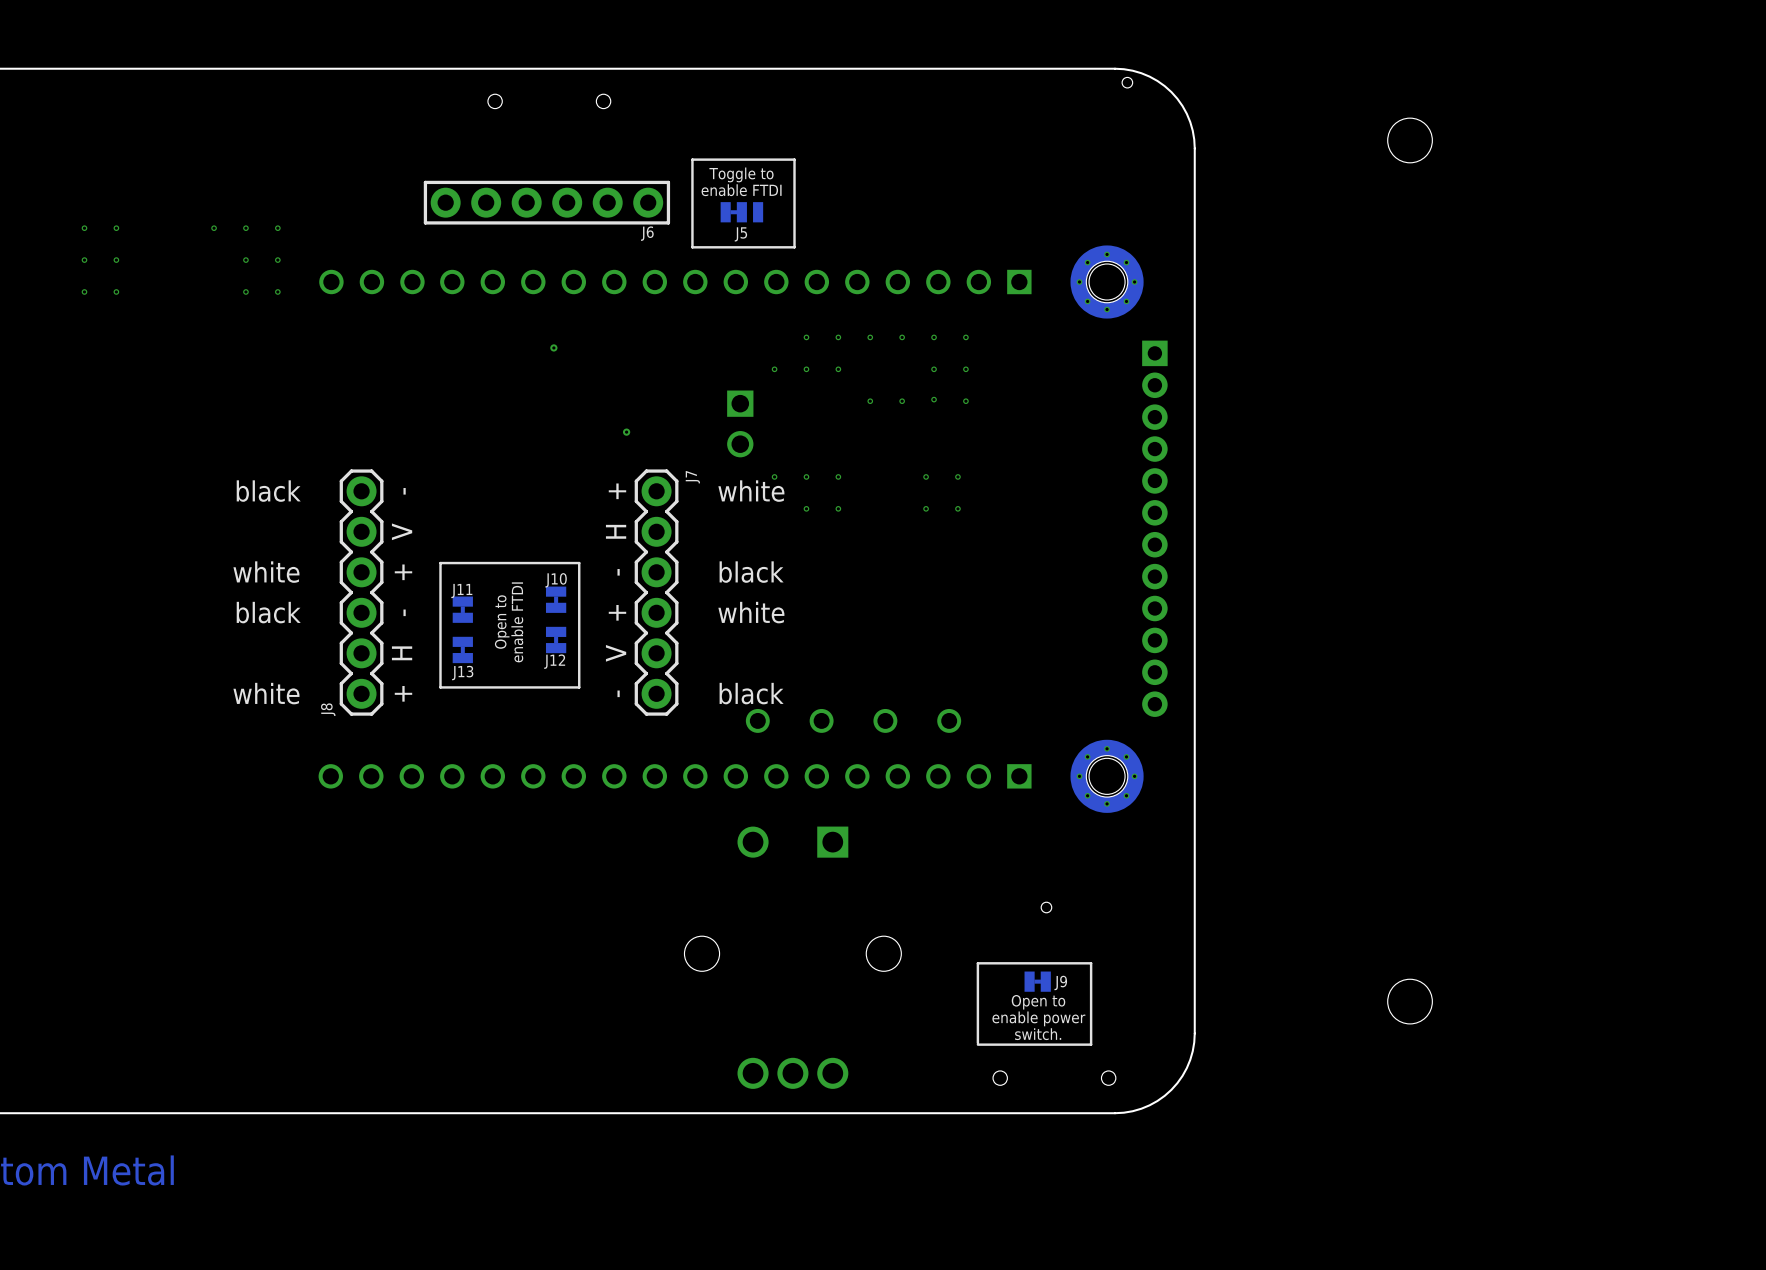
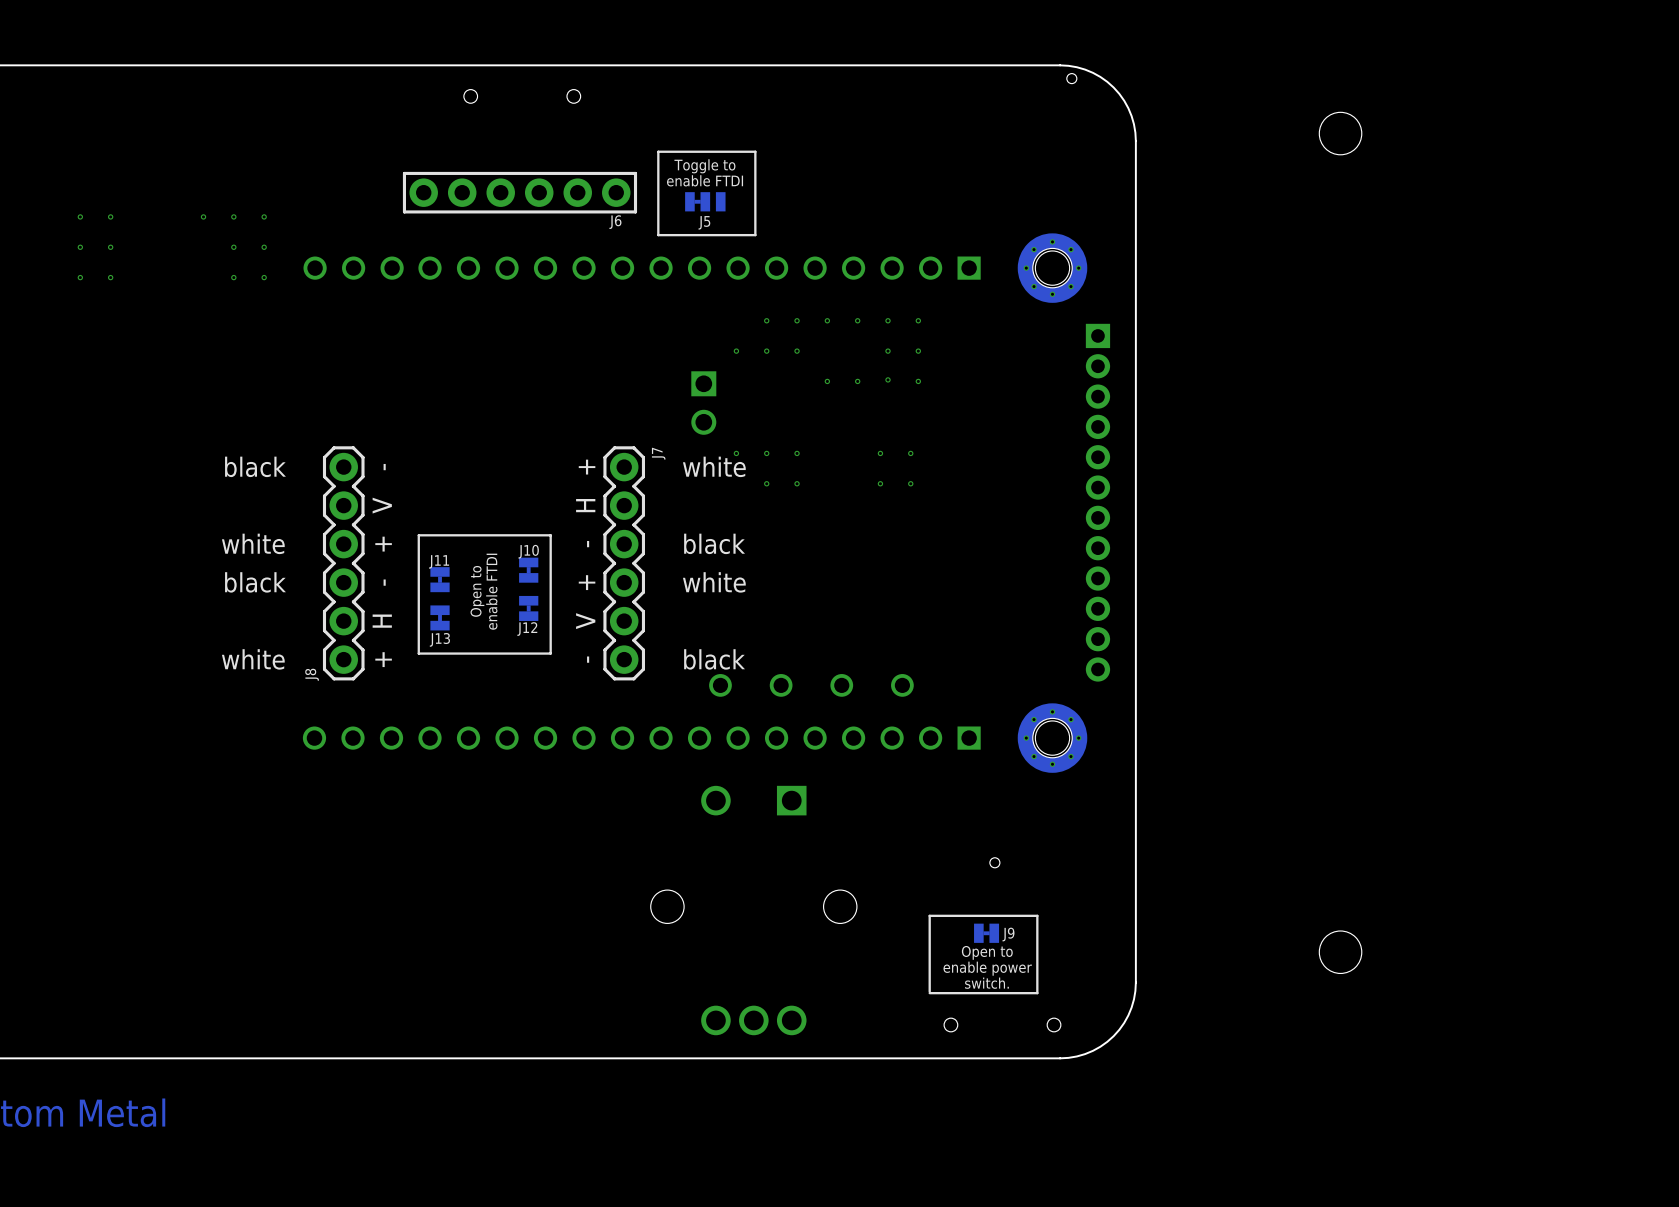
via: (553, 347) -> none
via: (626, 432) -> none

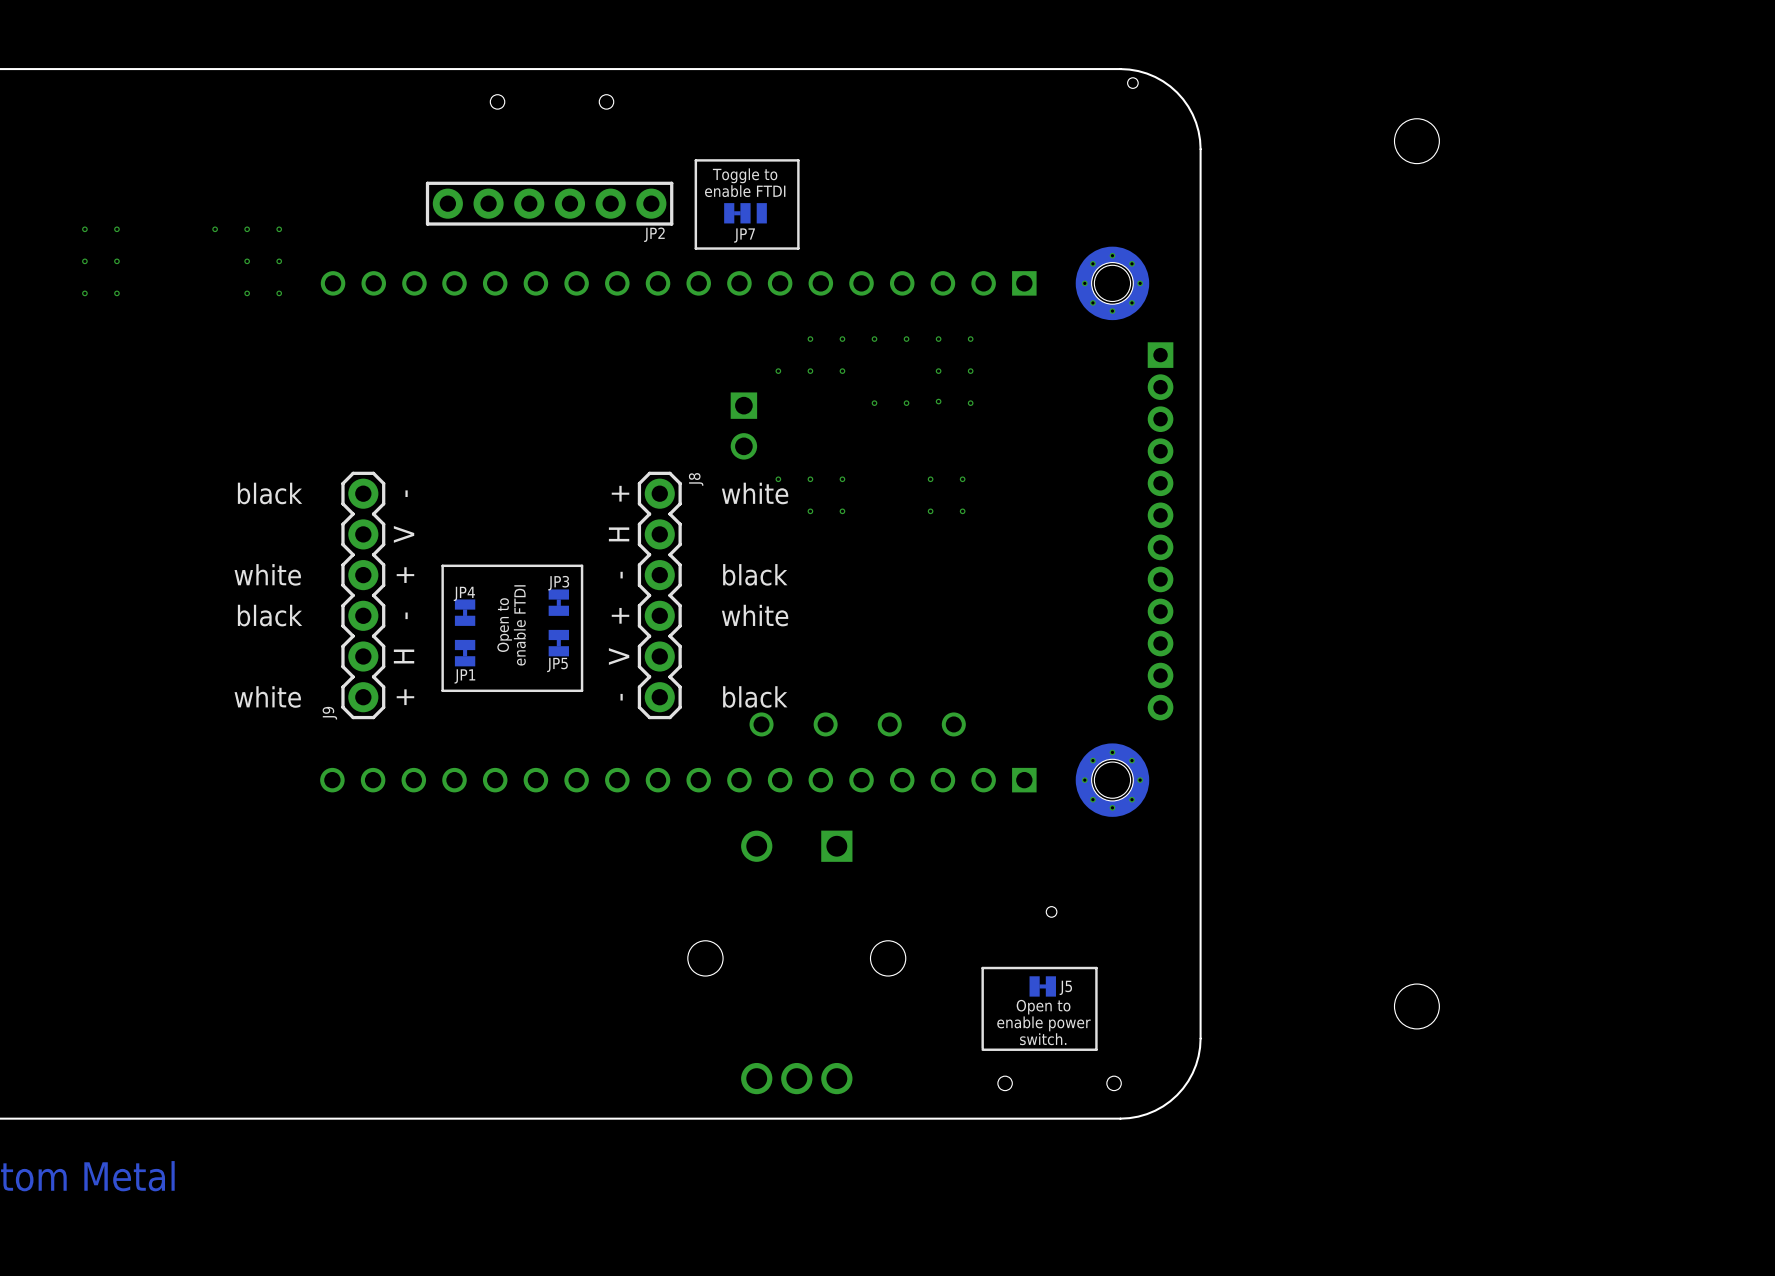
J6 name: J6 (615, 222) -> JP2 (654, 234)
J5 name: J5 (704, 222) -> JP7 (744, 235)
J7 name: J7 (658, 453) -> J8 (696, 479)
J10 name: J10 (528, 551) -> JP3 (558, 583)
J11 name: J11 (439, 561) -> JP4 (464, 593)
J12 name: J12 (527, 629) -> JP5 (557, 664)
J13 name: J13 (439, 639) -> JP1 (464, 676)
J8 name: J8 (312, 674) -> J9 (329, 713)
J9 name: J9 (1008, 934) -> J5 (1065, 987)

